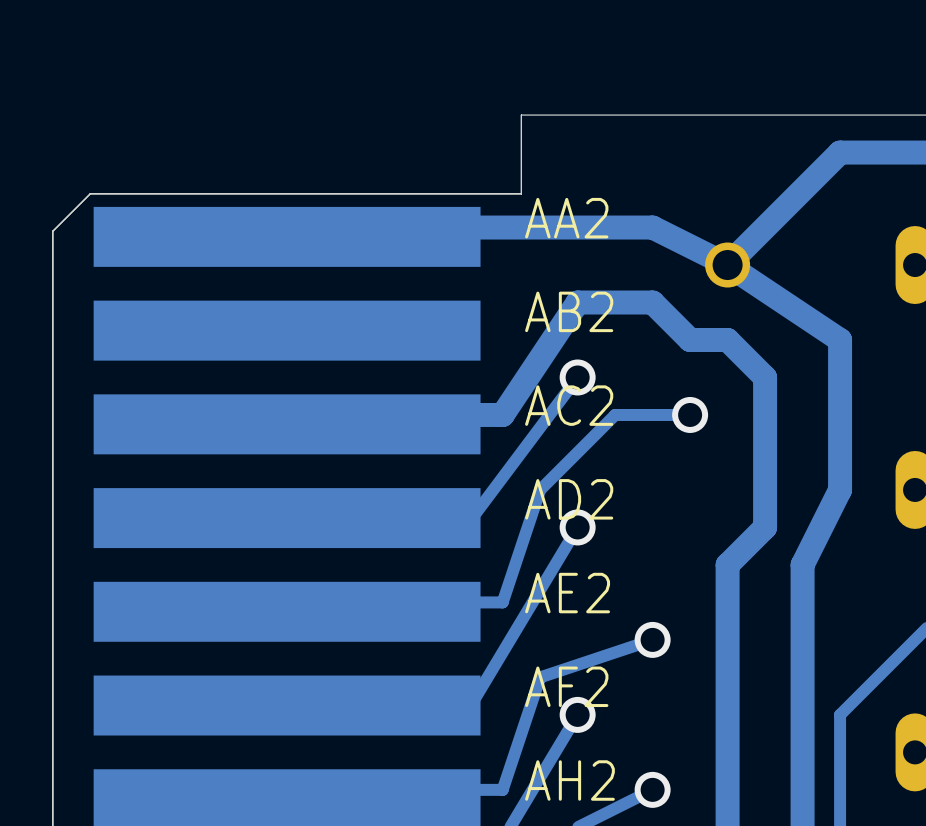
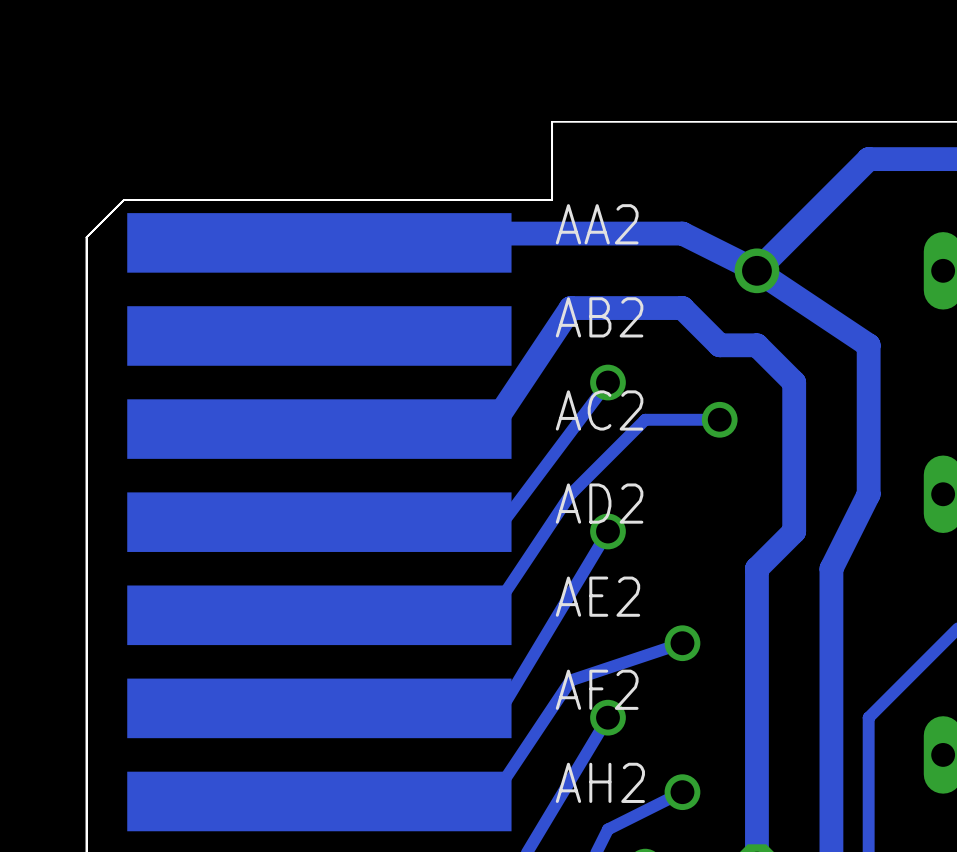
track: (577, 302) (502, 414) (465, 414) -> (607, 308) (570, 308) (496, 419)
track: (540, 489) (502, 602) (465, 602) -> (570, 494) (496, 605)
track: (540, 677) (502, 789) (465, 789) -> (570, 680) (496, 792)

